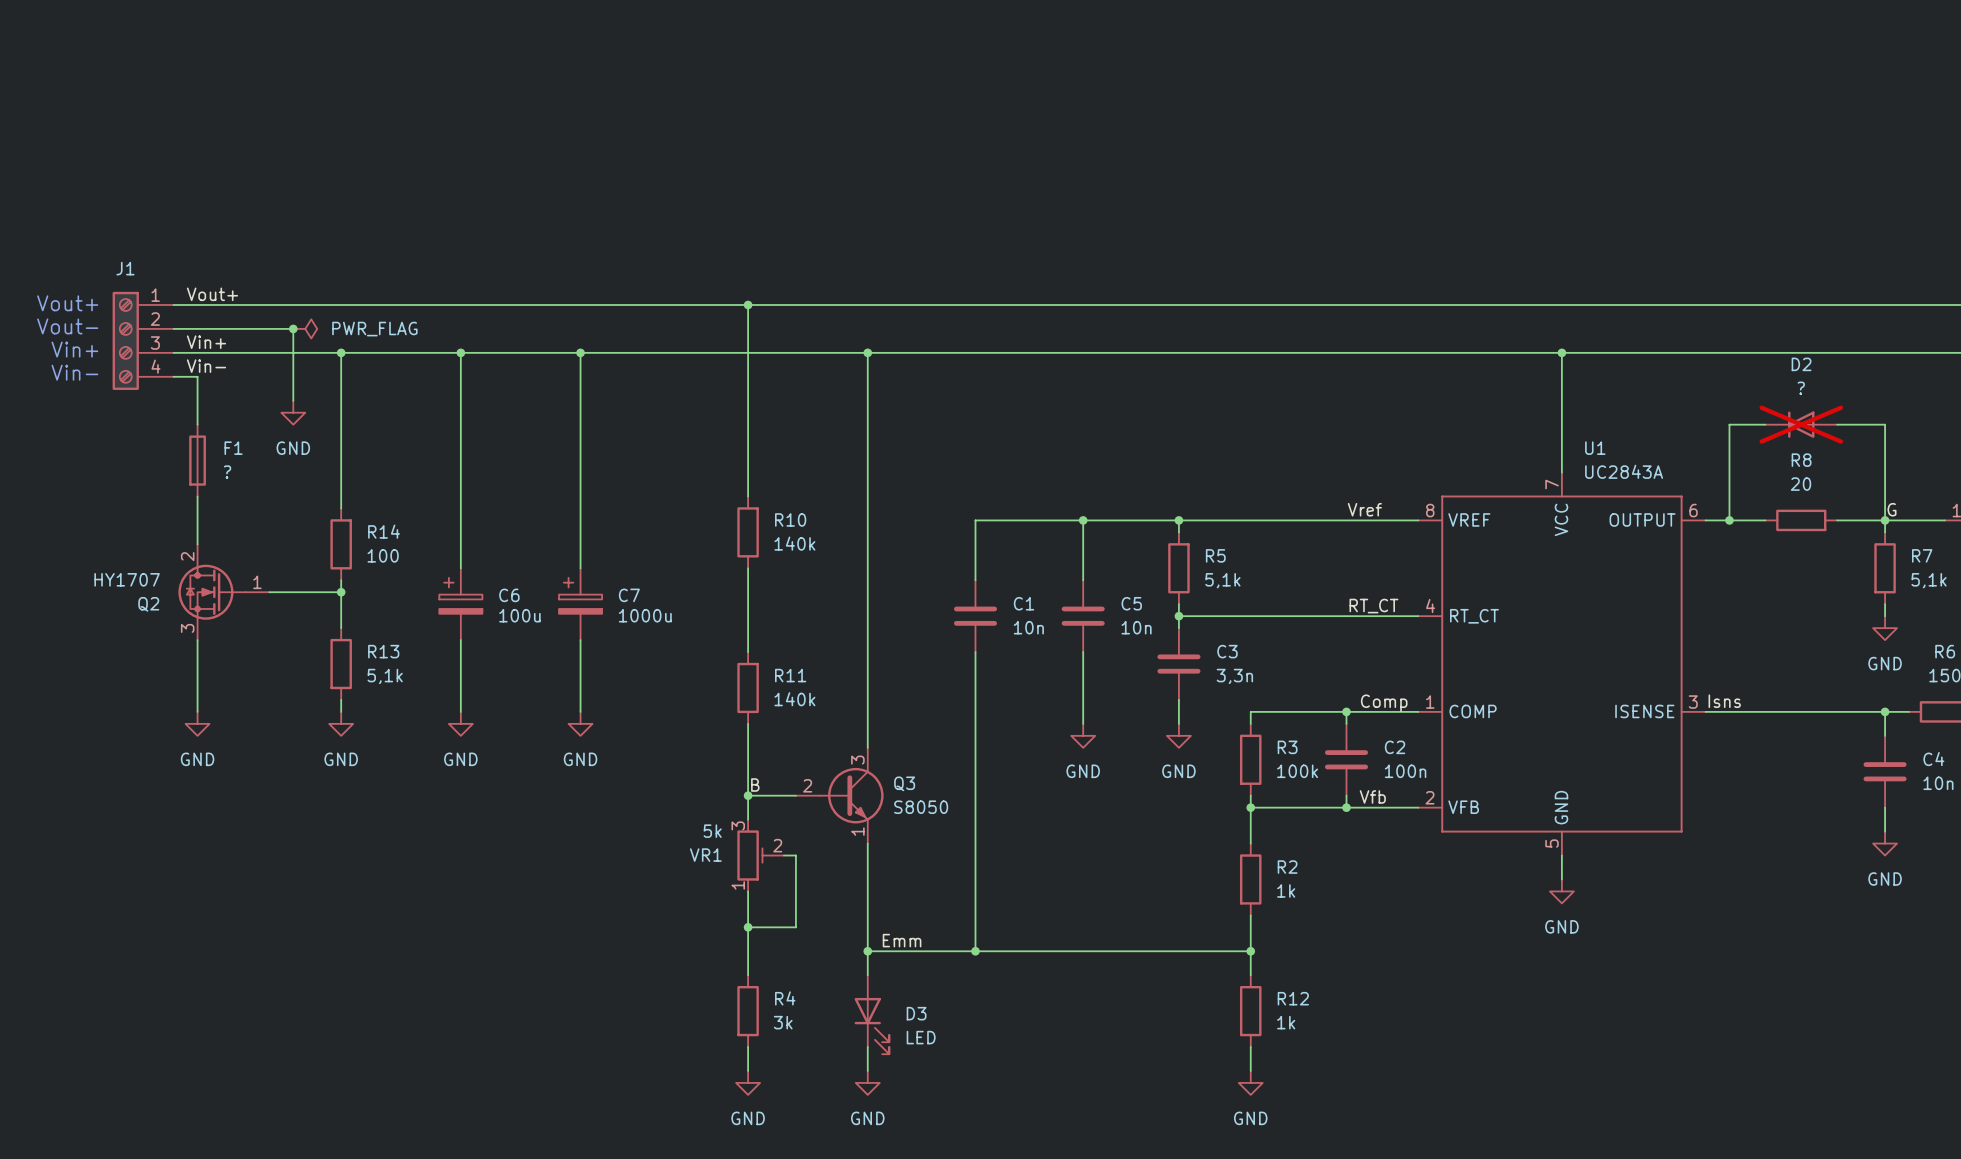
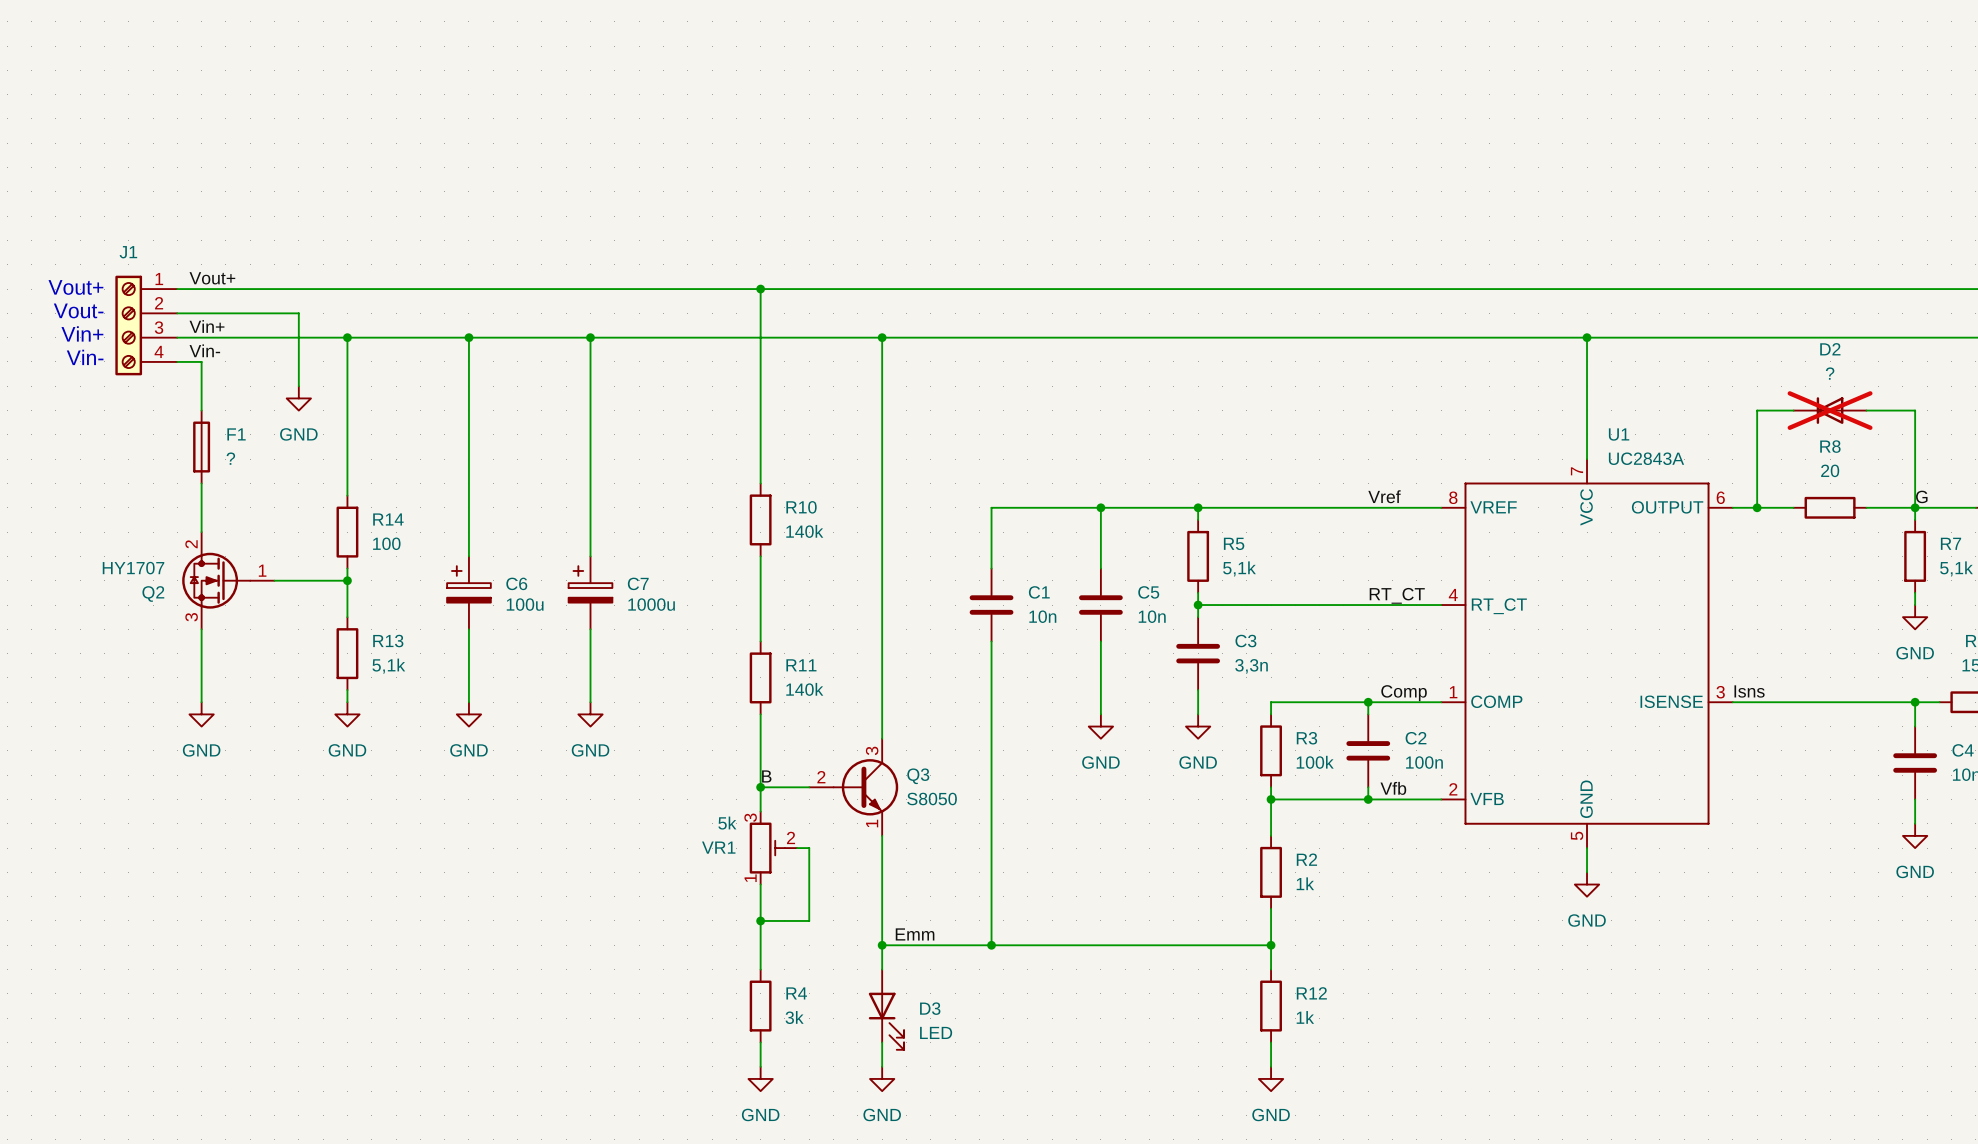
junction: (293, 328) -> none
power symbol: PWR_FLAG (305, 328) -> none

